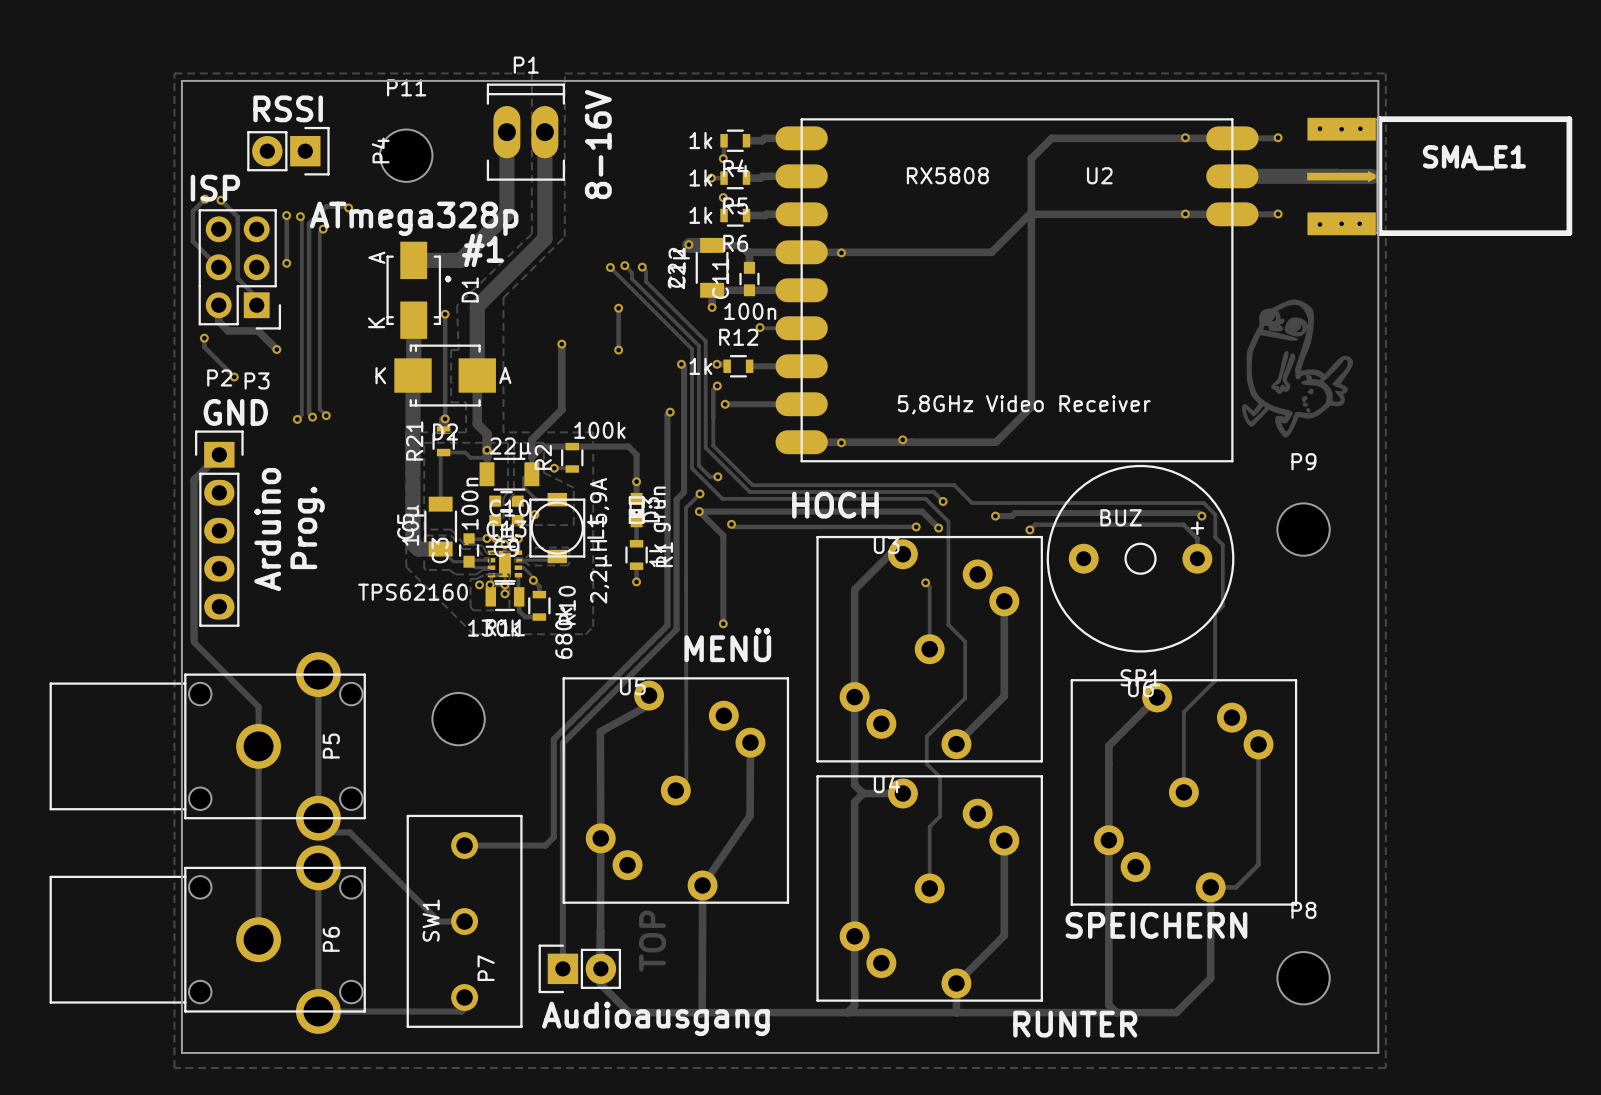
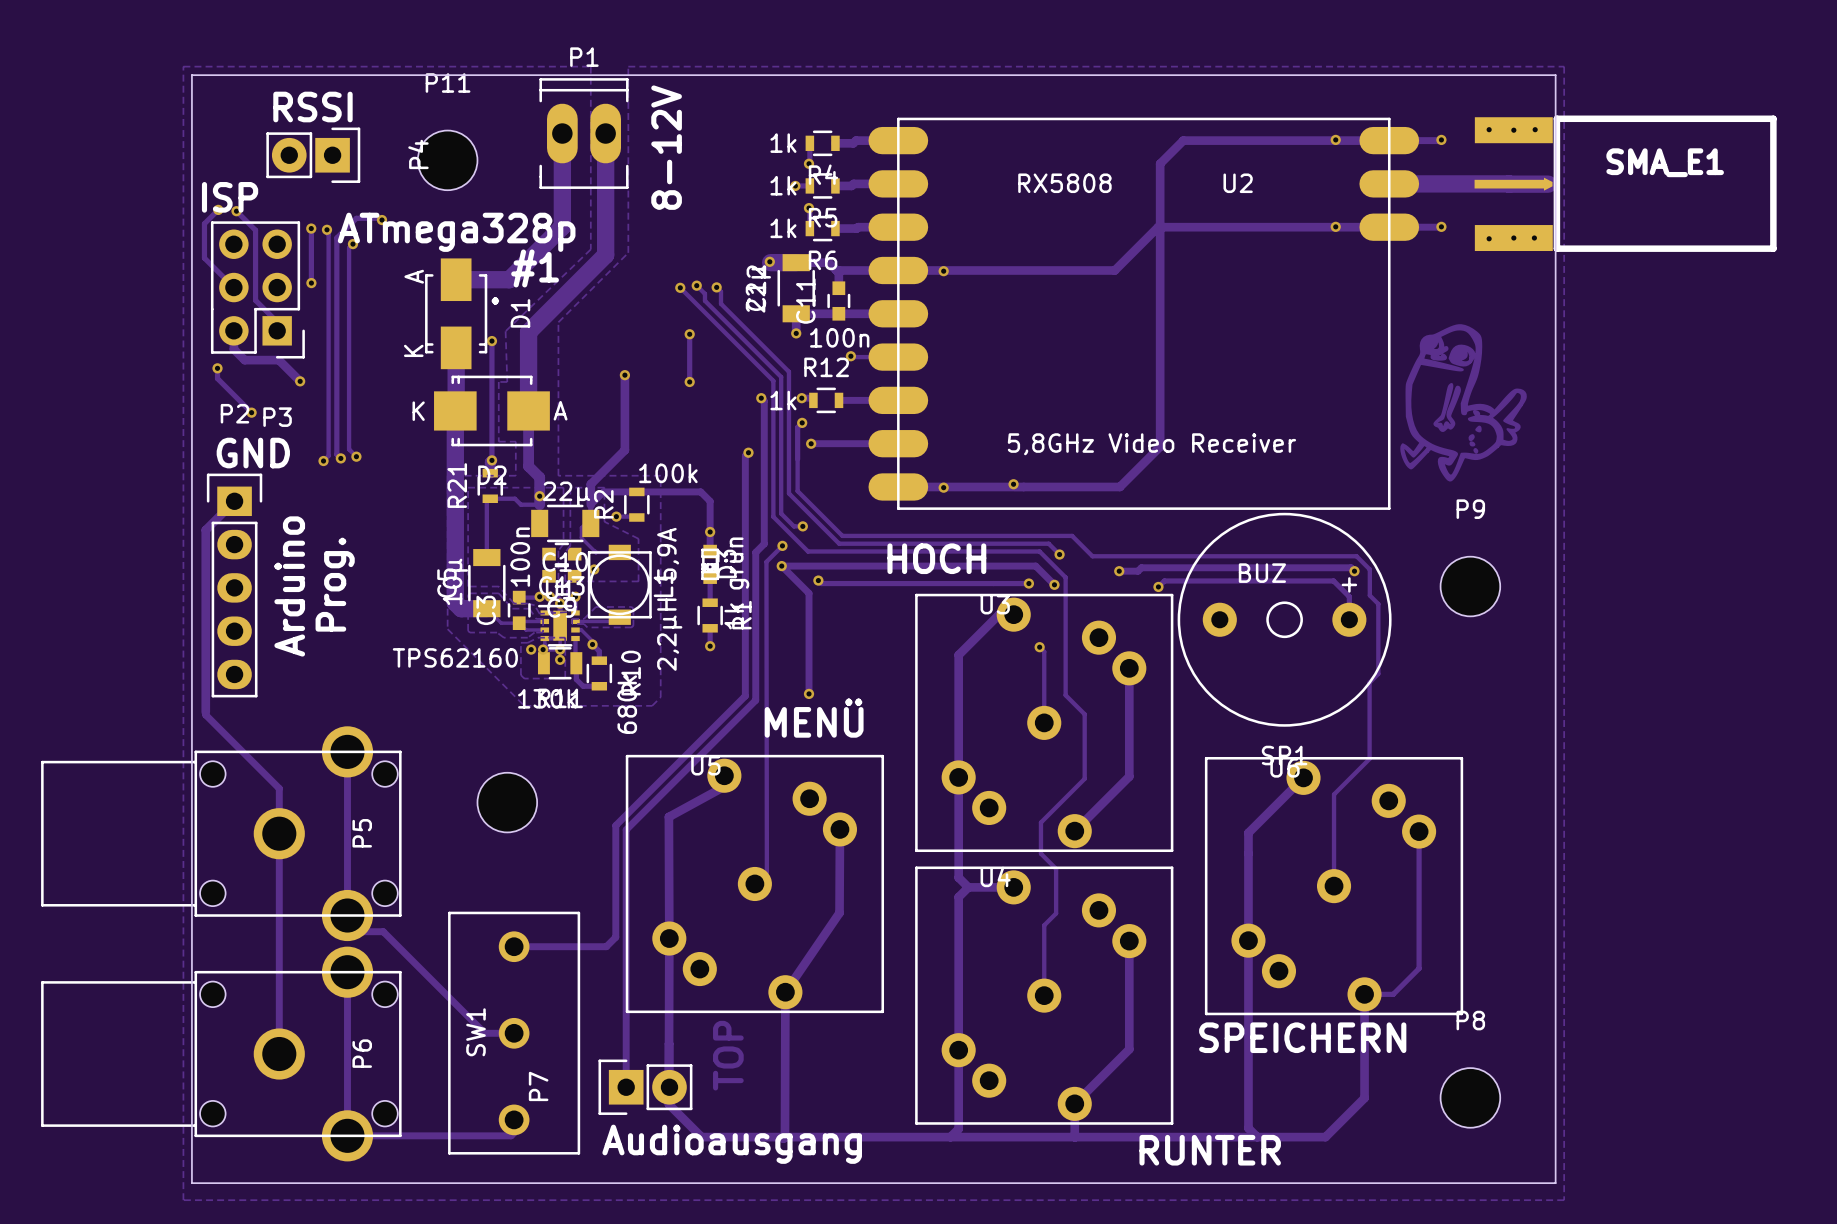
text: 8-16V (598, 144) -> 8-12V (666, 147)

